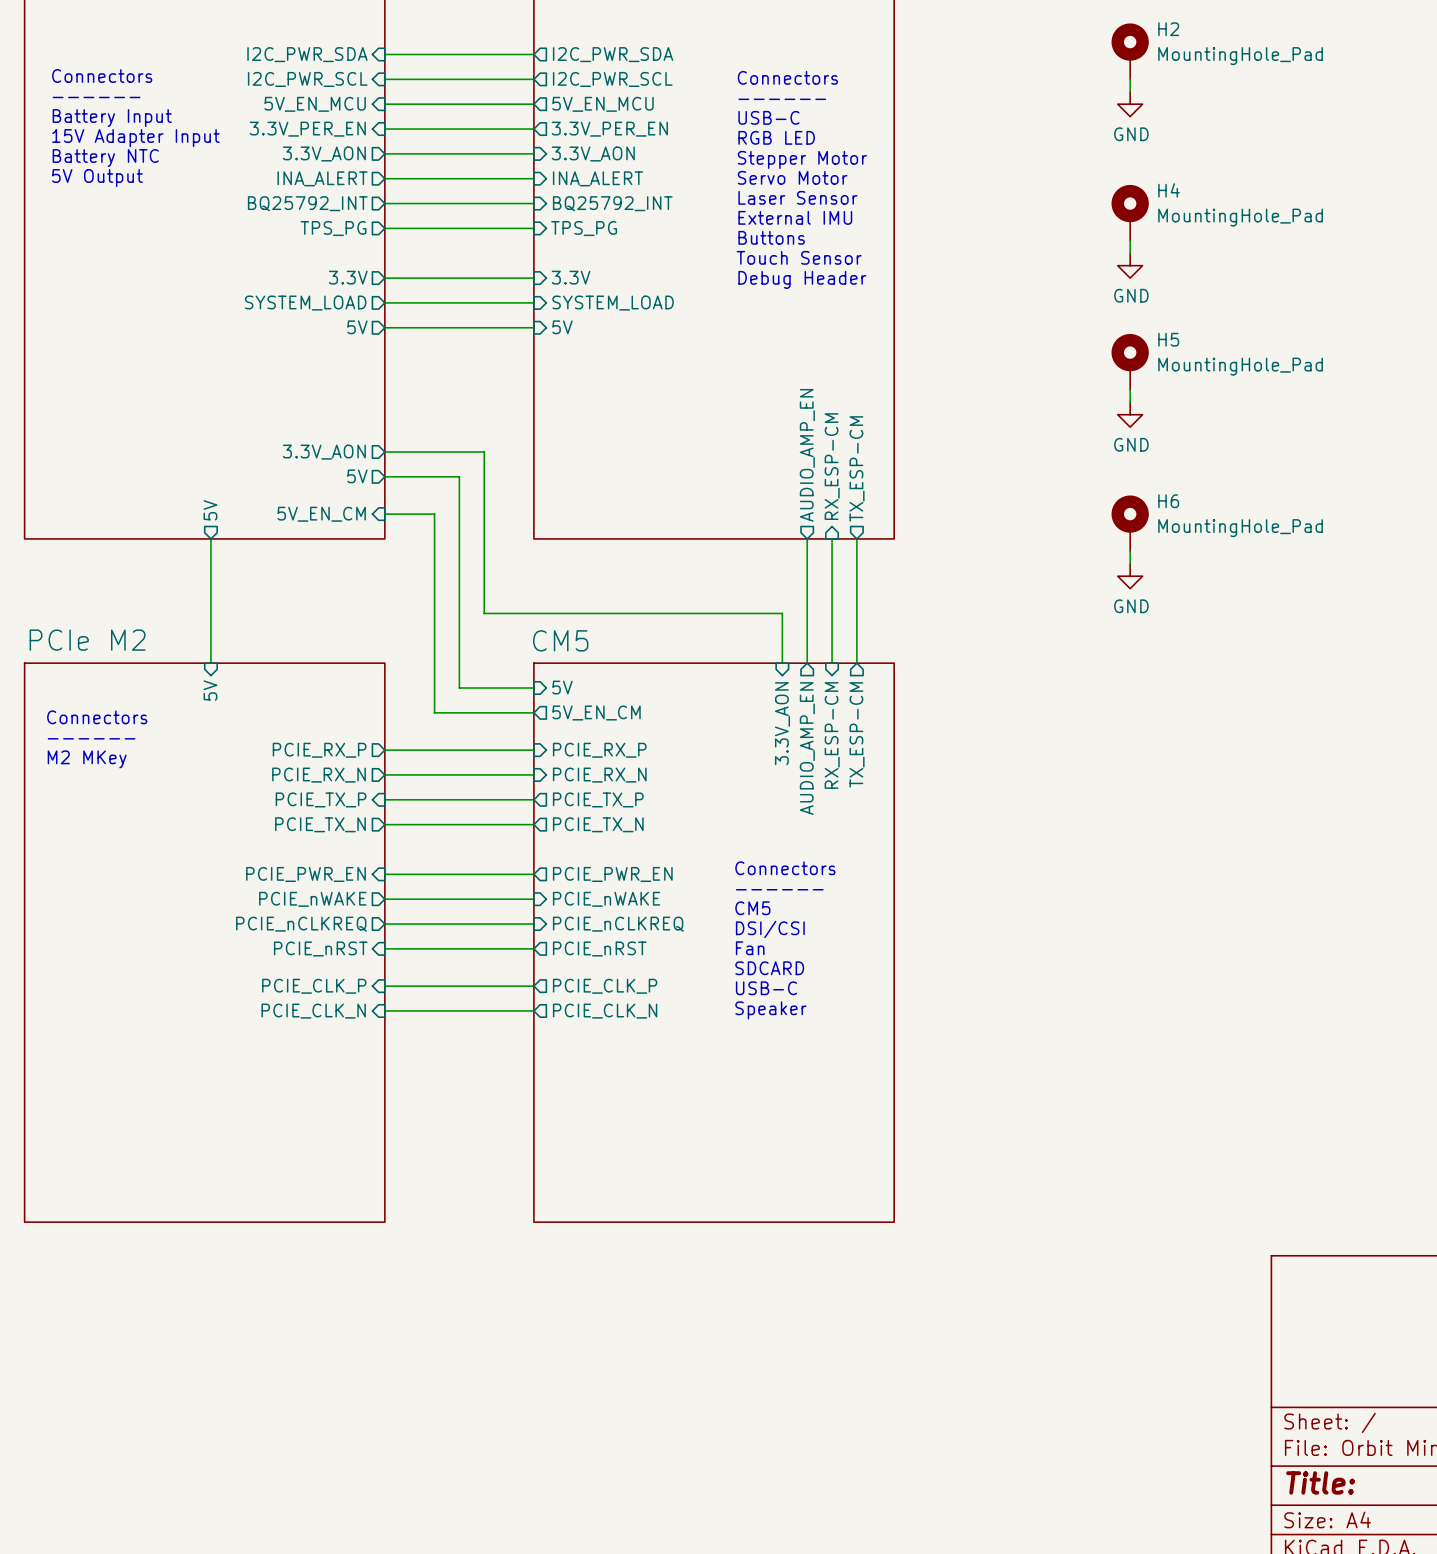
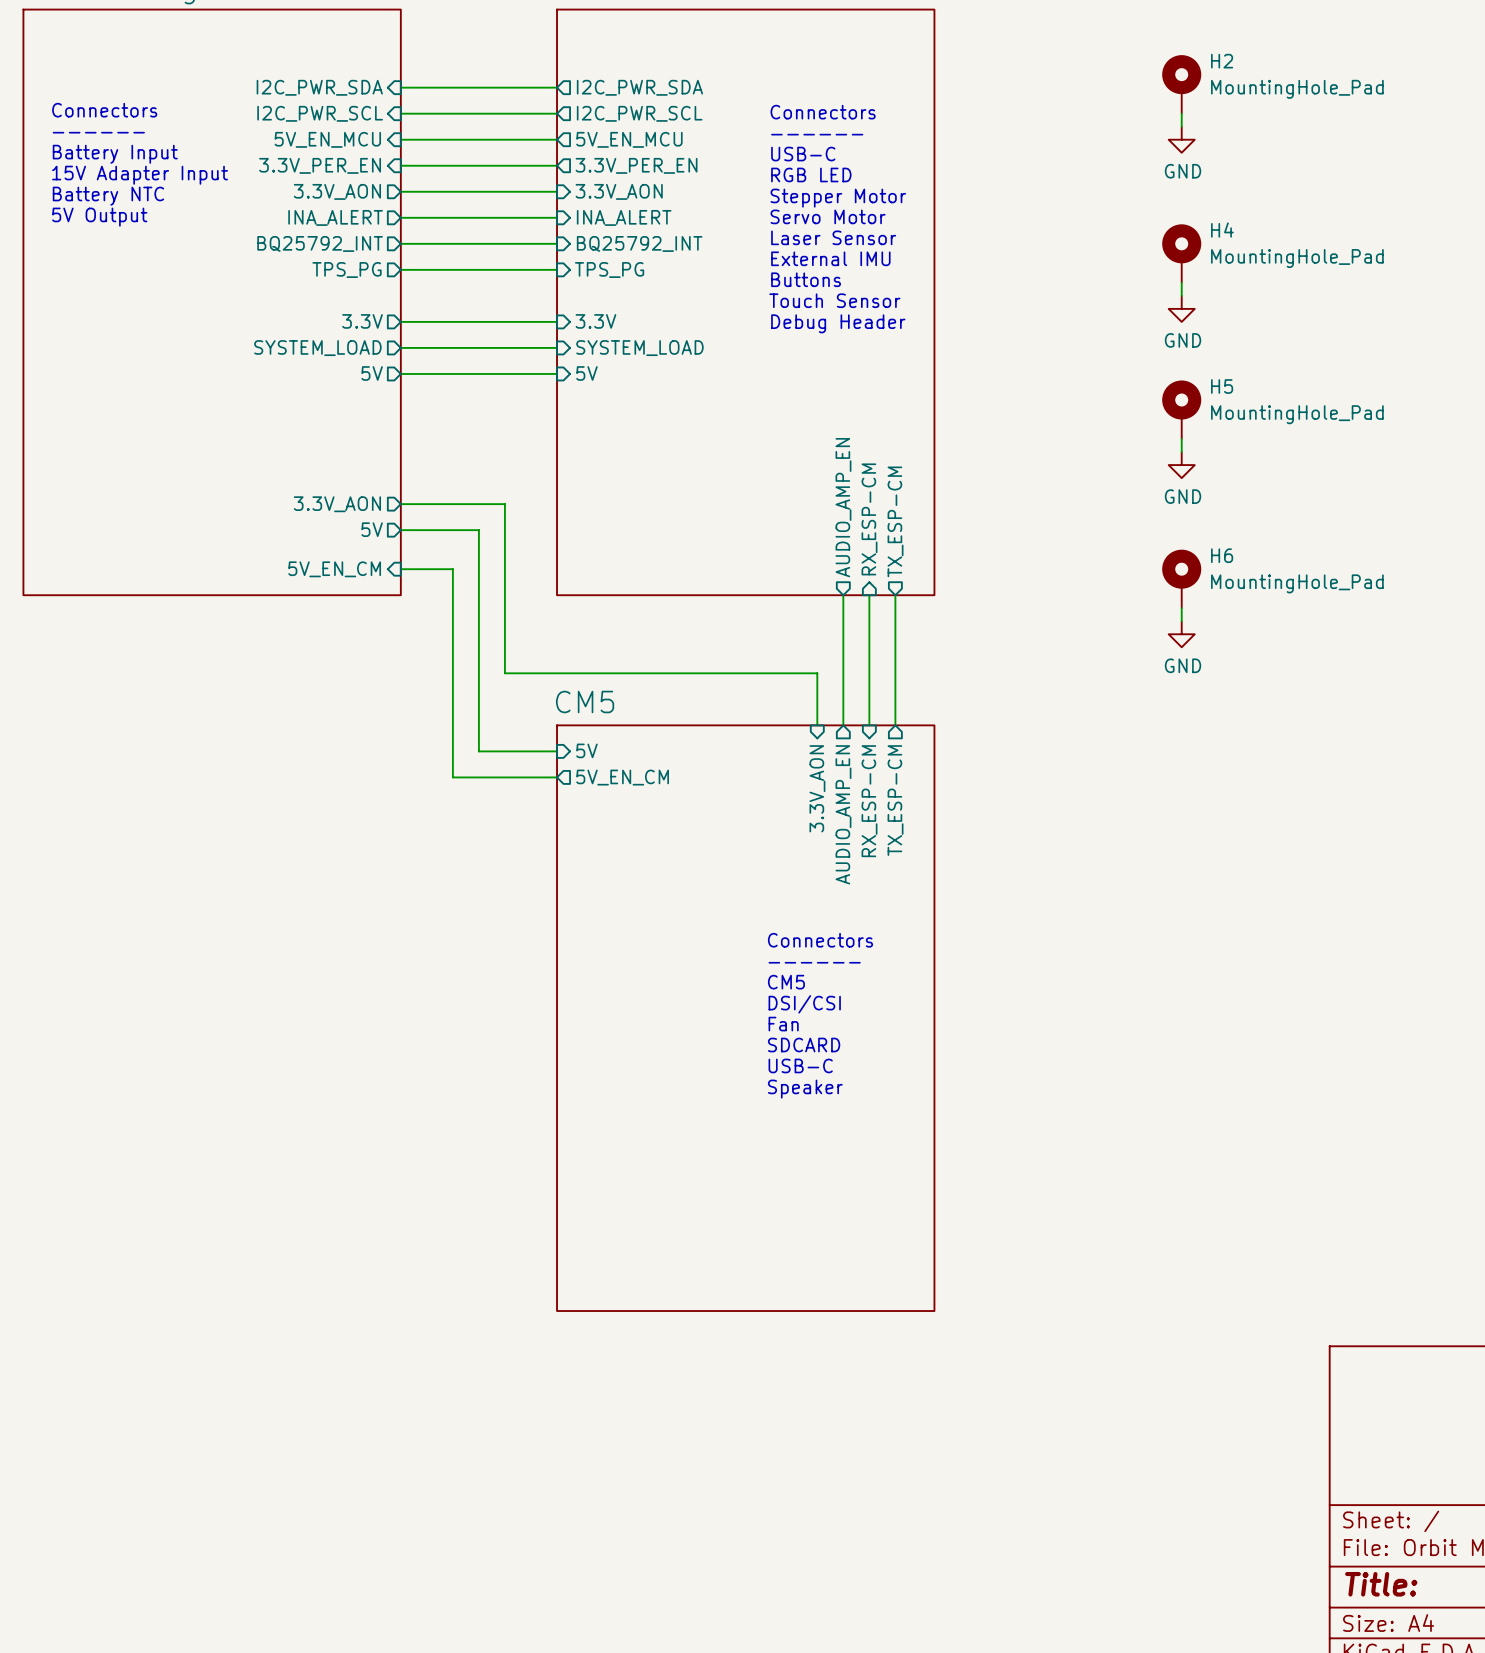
sheet pin: 5V (210, 510) -> none
wire: (210, 538) (210, 663) -> none
sheet pin: 5V (210, 690) -> none
text: Connectors (97, 717) -> none
text: ------ (91, 738) -> none
sheet pin: PCIE_RX_P (319, 750) -> none
wire: (384, 750) (533, 750) -> none
sheet pin: PCIE_RX_P (599, 750) -> none
text: M2 MKey (87, 759) -> none
wire: (384, 774) (533, 774) -> none
sheet pin: PCIE_RX_N (319, 775) -> none
sheet pin: PCIE_RX_N (599, 775) -> none
sheet pin: PCIE_TX_P (321, 799) -> none
wire: (384, 799) (533, 799) -> none
sheet pin: PCIE_TX_P (598, 799) -> none
sheet pin: PCIE_TX_N (320, 824) -> none
wire: (384, 824) (533, 824) -> none
sheet pin: PCIE_TX_N (598, 824) -> none
sheet pin: PCIE_PWR_EN (305, 874) -> none
wire: (384, 874) (533, 874) -> none
sheet pin: PCIE_PWR_EN (612, 874) -> none
sheet pin: PCIE_nWAKE (312, 899) -> none
wire: (384, 899) (533, 899) -> none
sheet pin: PCIE_nWAKE (606, 899) -> none
sheet pin: PCIE_nCLKREQ (301, 924) -> none
wire: (384, 924) (533, 924) -> none
sheet pin: PCIE_nCLKREQ (618, 924) -> none
sheet PCIe M2: (204, 942) -> none
sheet pin: PCIE_nRST (320, 948) -> none
wire: (384, 948) (533, 948) -> none
sheet pin: PCIE_nRST (599, 948) -> none
sheet pin: PCIE_CLK_P (314, 986) -> none
wire: (384, 986) (533, 986) -> none
sheet pin: PCIE_CLK_P (605, 986) -> none
wire: (384, 1010) (533, 1010) -> none
sheet pin: PCIE_CLK_N (313, 1011) -> none
sheet pin: PCIE_CLK_N (605, 1011) -> none

